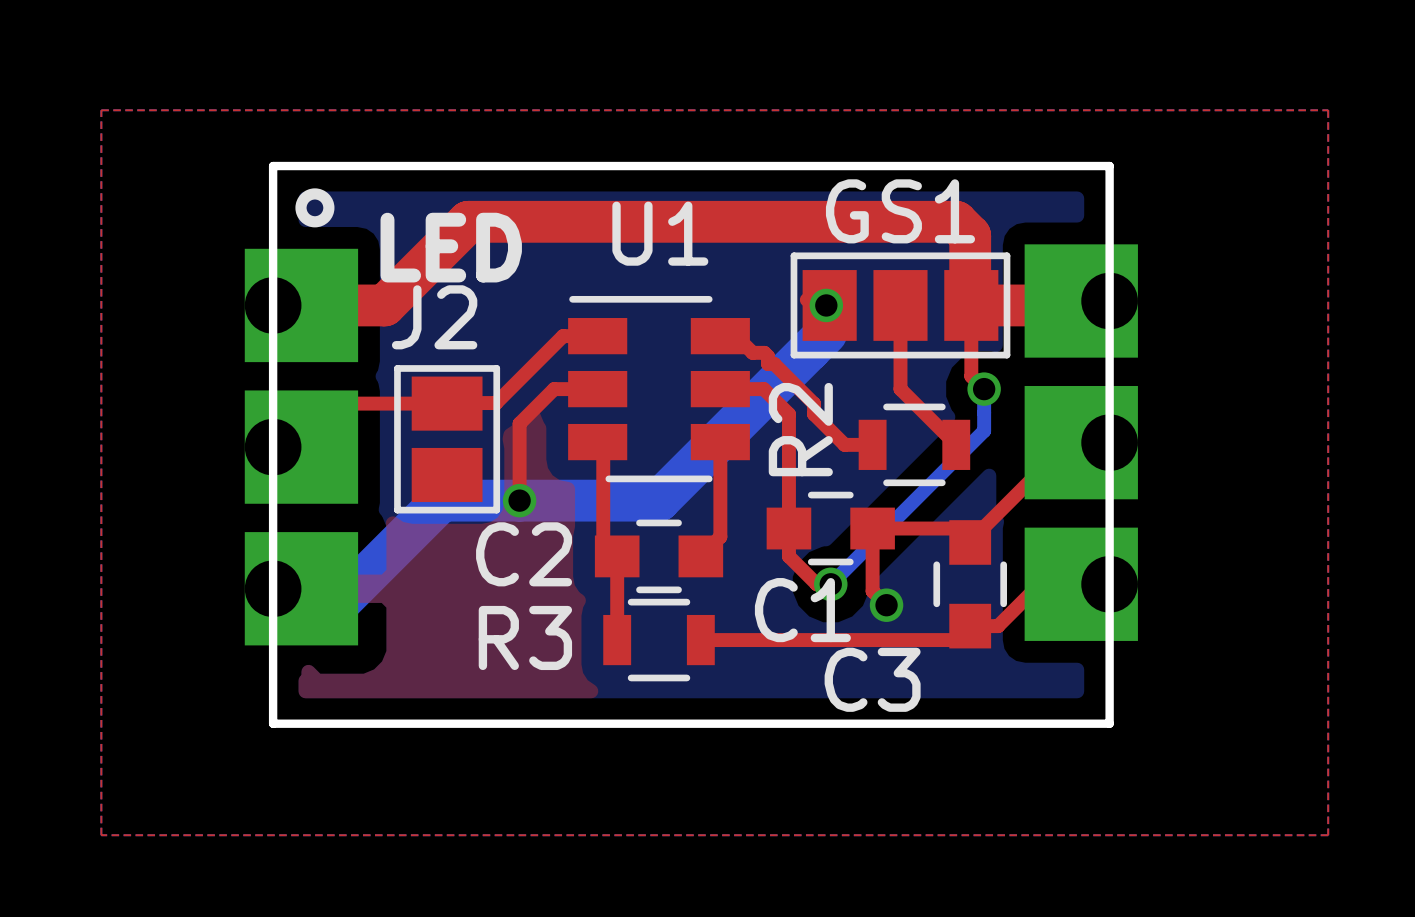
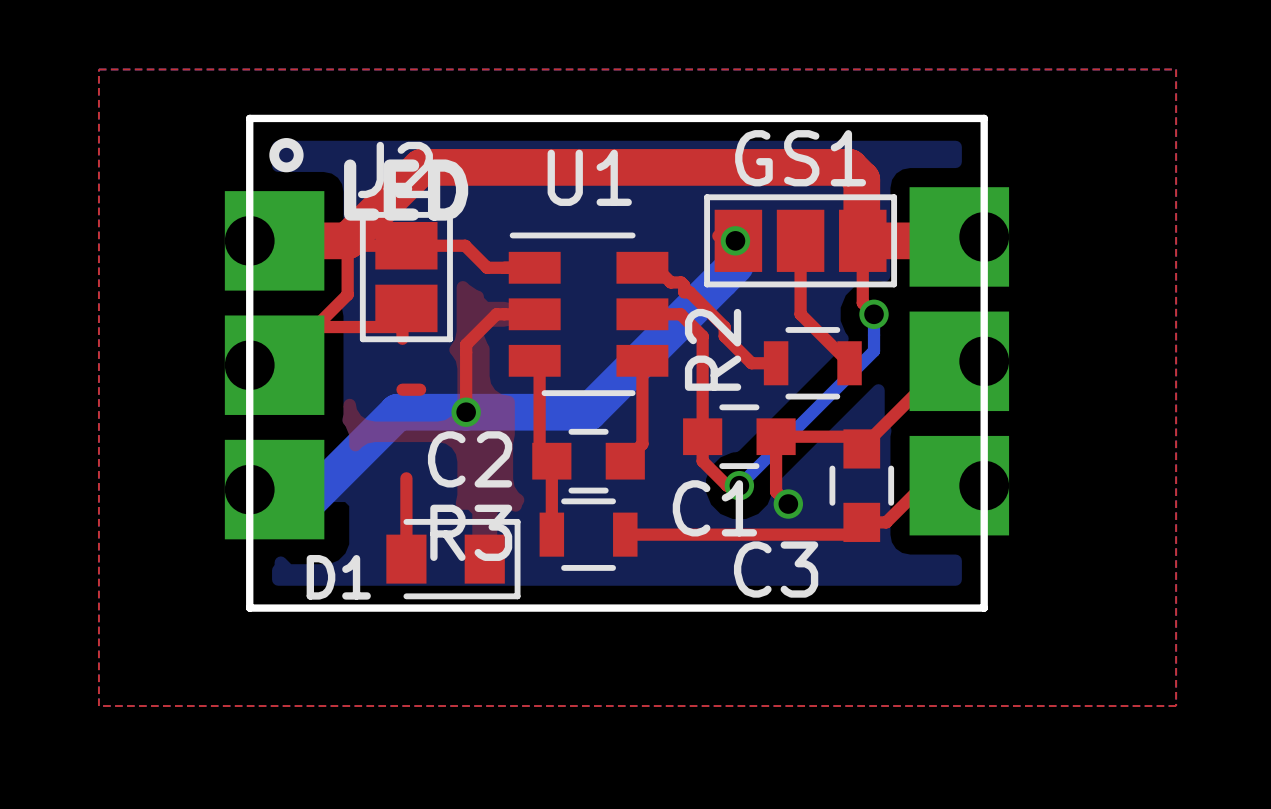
top track: (563, 336) (496, 403) (447, 403) -> (504, 267) (487, 267) (465, 245) (347, 245) (347, 294) (277, 365) (249, 365)
J2 position: (447, 439) -> (406, 277)
top track: none -> (406, 478) (406, 559)
D1: none -> (453, 559)

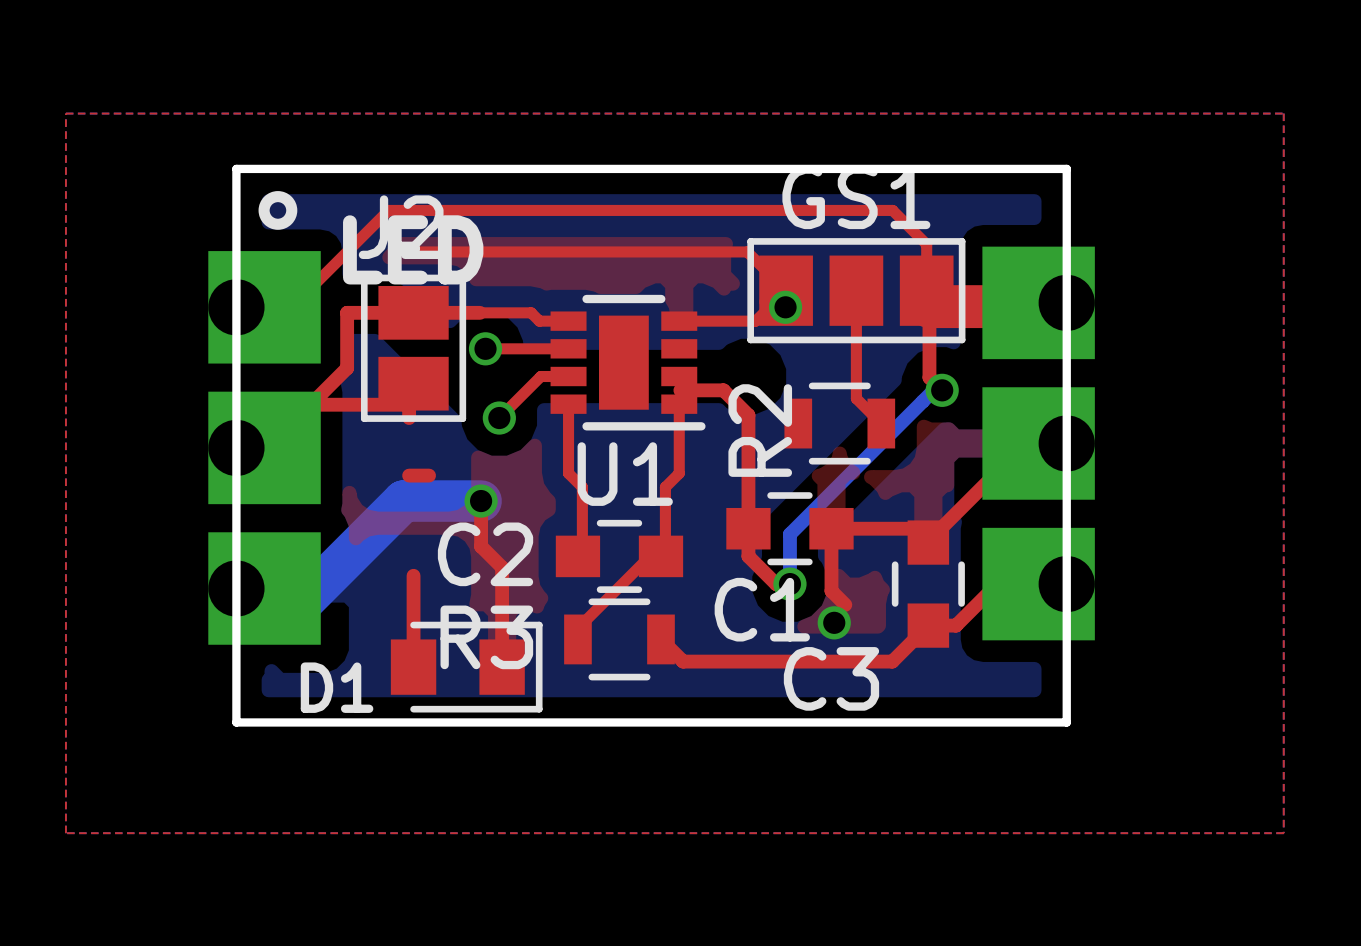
U1 name position: U1 (589, 177) -> U1 (625, 474)
top track: none -> (416, 251) (747, 251) (786, 290)
top track: none -> (786, 290) (755, 321) (679, 321)
U1 footprint: [508, 232, 669, 397] -> [550, 294, 706, 431]
top track: (298, 240) (347, 240) (421, 167) (849, 167) (861, 179) (862, 240) -> (291, 307) (388, 210) (892, 210) (926, 244) (926, 290) (1054, 290)
top track: (800, 240) (800, 314) (849, 363) -> none
GS1 position: (800, 240) -> (856, 290)
top track: (465, 245) (487, 267) (534, 267) -> (479, 312) (531, 312) (539, 321) (568, 321)
top track: none -> (856, 318) (856, 290) (856, 398) (881, 423) (878, 420)
bottom track: (735, 265) (588, 412) (466, 412) -> none
top track: (642, 267) (656, 267) (670, 282) (681, 282) (684, 285) (684, 292) (689, 292) (724, 327) (724, 336) (751, 363) (776, 363) -> none
top track: none -> (485, 348) (568, 348)
via: none -> (485, 348)
top track: none -> (568, 376) (540, 376) (499, 418)
top track: (534, 314) (496, 314) (466, 344) (466, 412) -> (502, 667) (502, 567) (481, 546) (481, 501)
bottom track: (874, 314) (874, 351) (739, 485) -> (939, 384) (789, 534) (789, 584)
top track: none -> (568, 404) (568, 473) (582, 487) (582, 556)
via: none -> (499, 418)
top track: (534, 360) (539, 365) (539, 448) (551, 461) (551, 524) -> (679, 404) (679, 473) (665, 487) (665, 556) (649, 556) (577, 628)
top track: (642, 360) (642, 444) (625, 461) -> none
R2 position: (812, 363) -> (839, 423)
via position: (788, 504) -> (834, 622)
top track: (625, 534) (849, 534) -> (660, 639) (683, 661) (892, 661) (914, 639)

